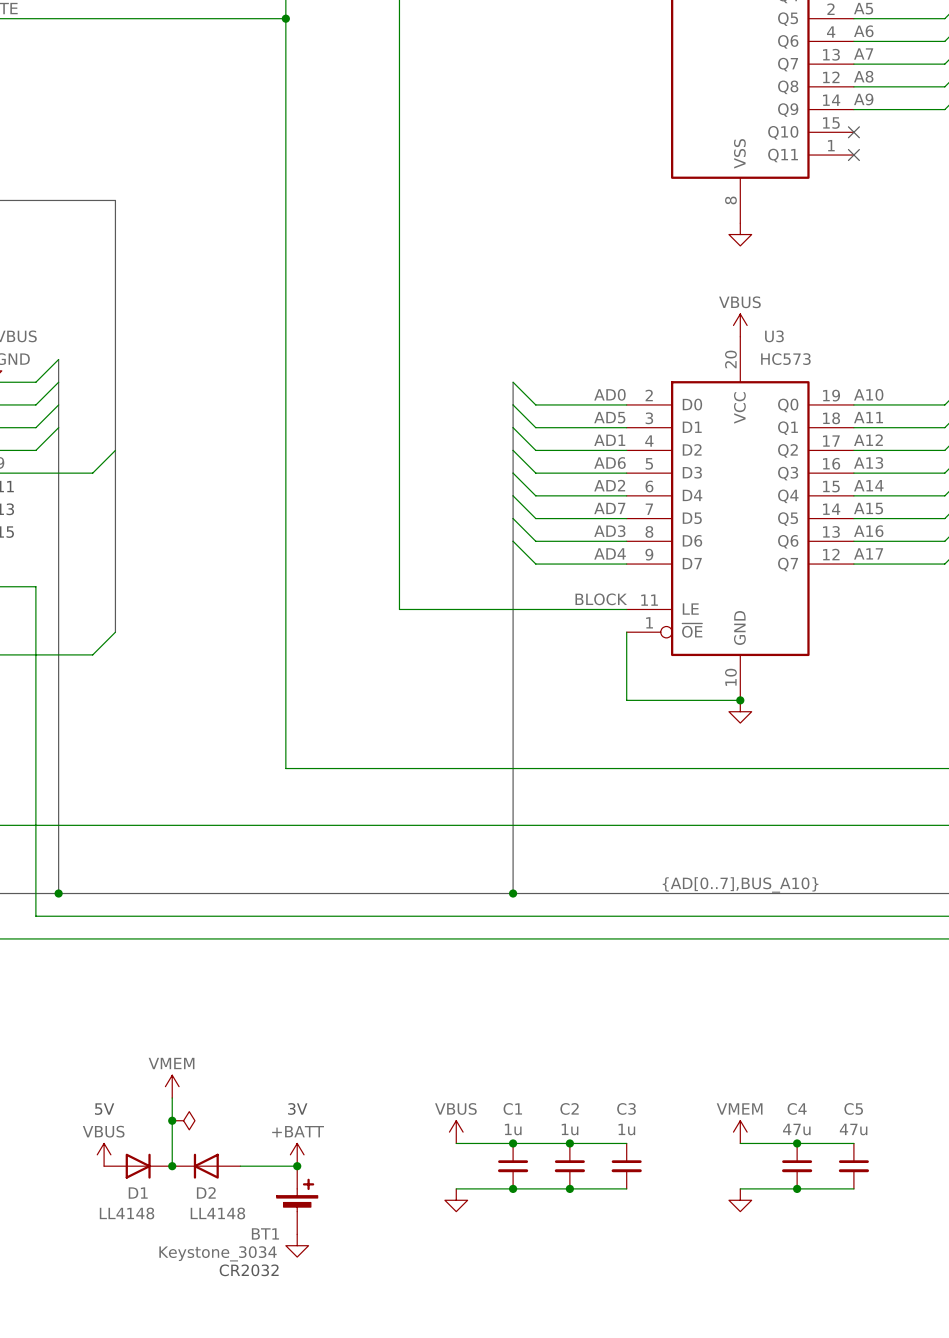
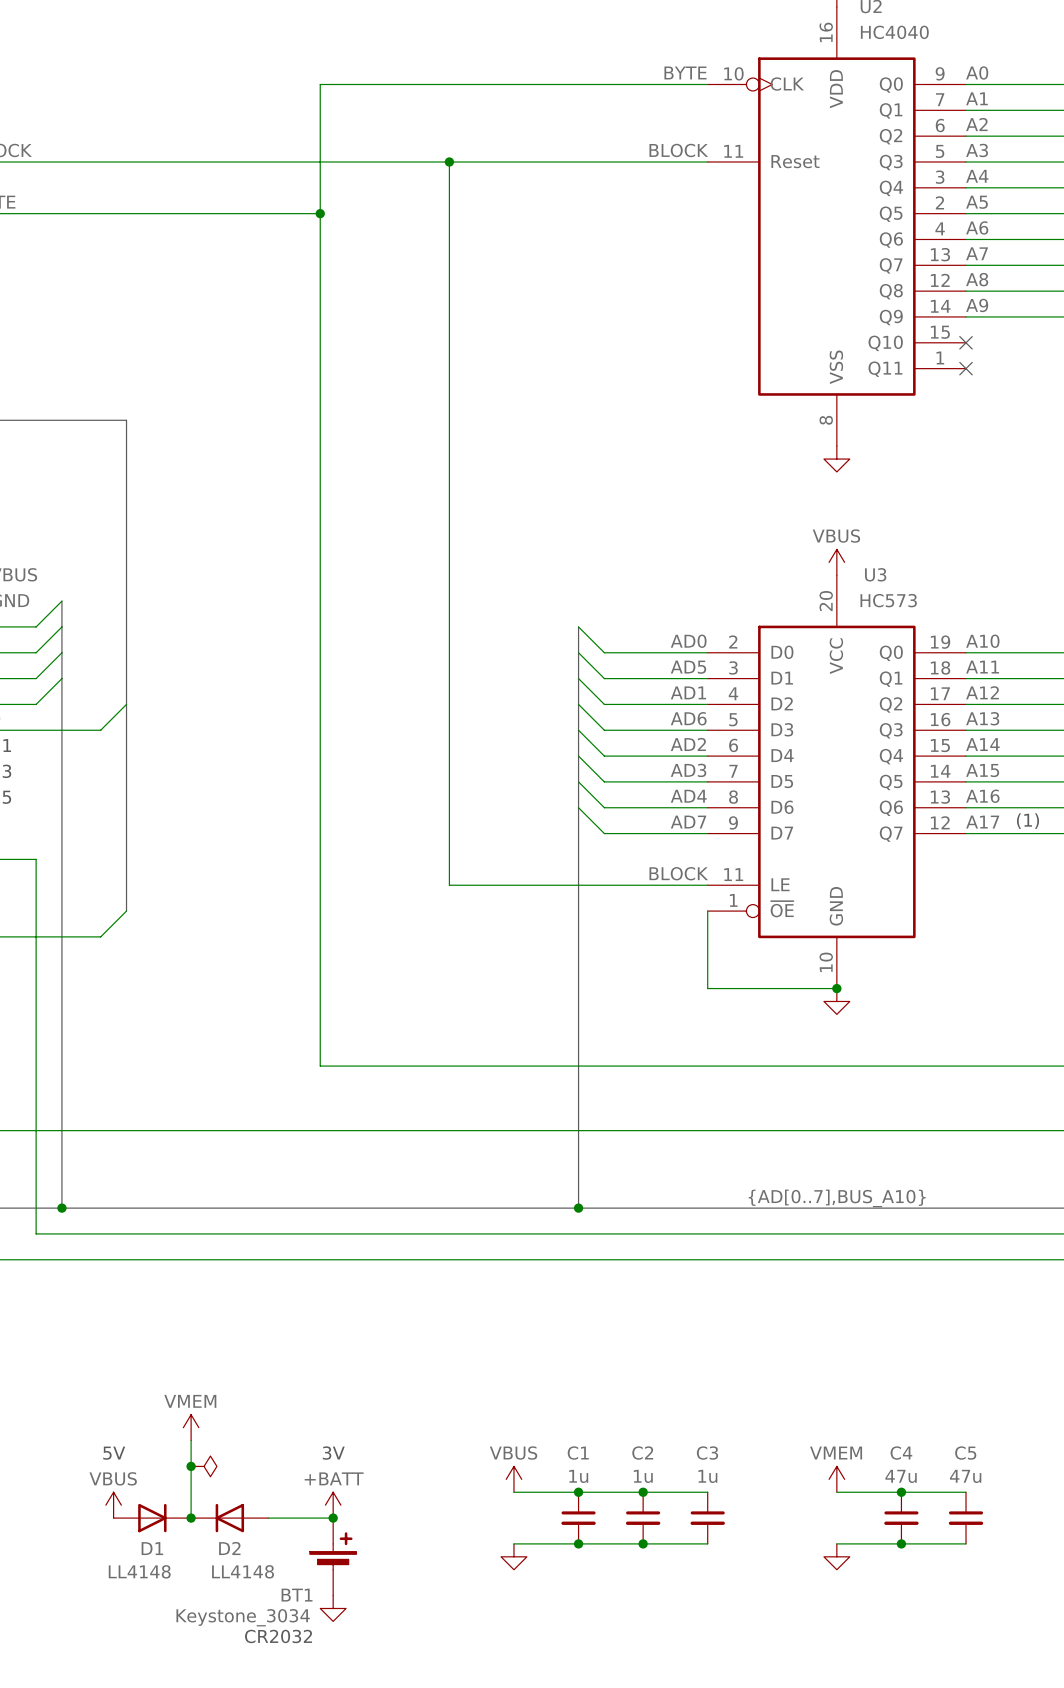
label: AD7 (609, 508) -> AD3 (688, 770)
label: AD3 (609, 531) -> AD4 (688, 796)
label: AD4 (610, 553) -> AD7 (688, 822)
text: none -> (1) (1028, 821)

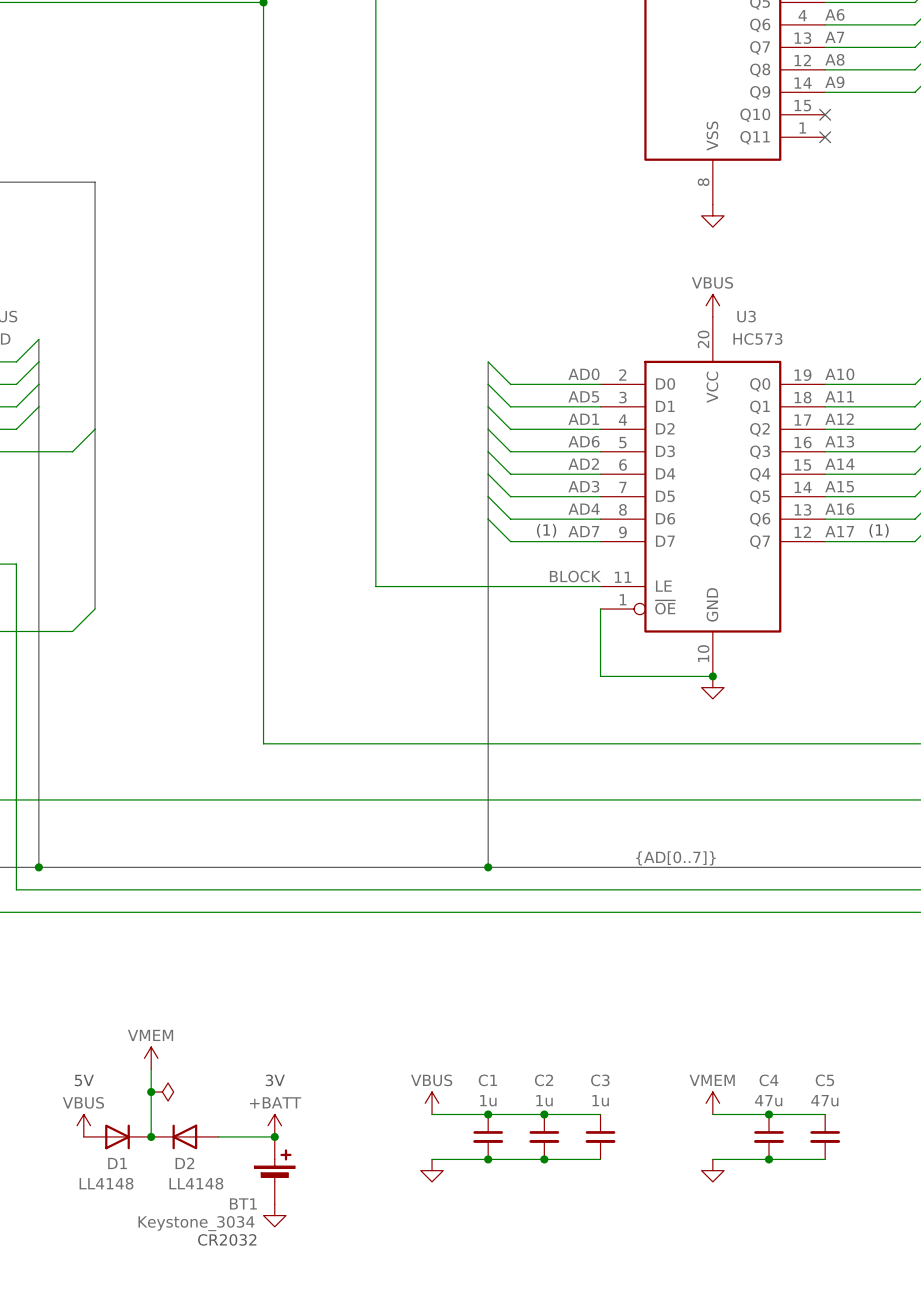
text: none -> (1) (546, 530)
label: {AD[0..7],BUS_A10} (837, 1198) -> {AD[0..7]} (675, 858)

